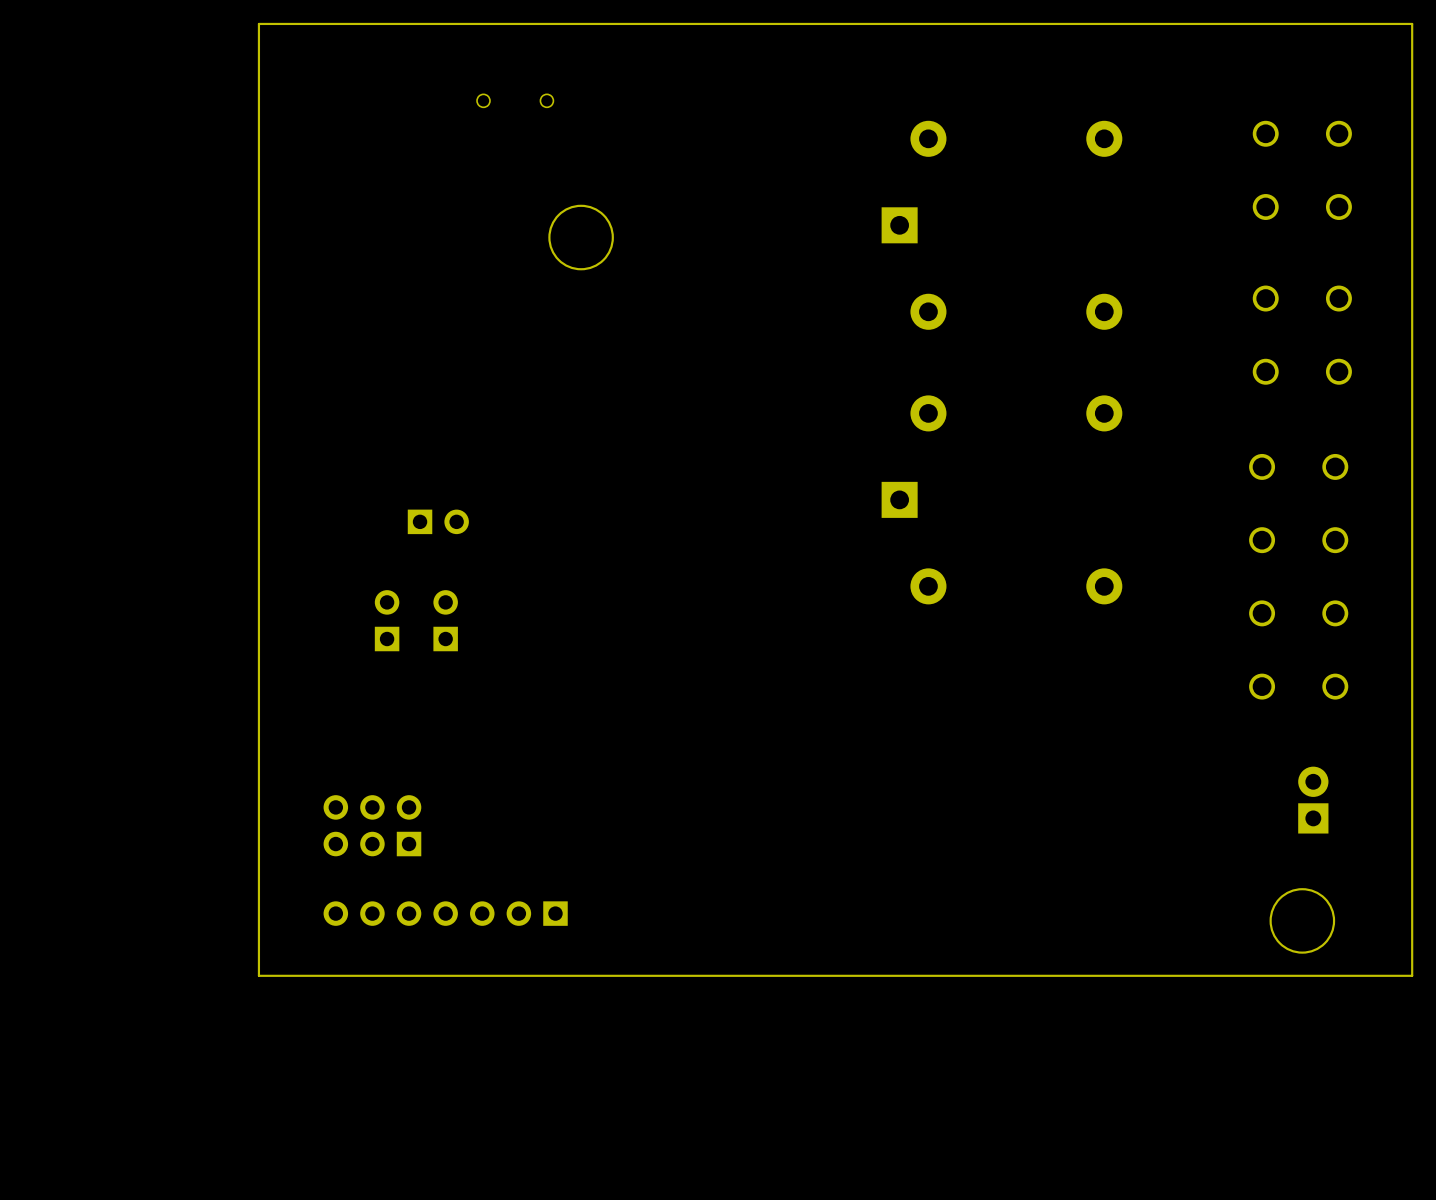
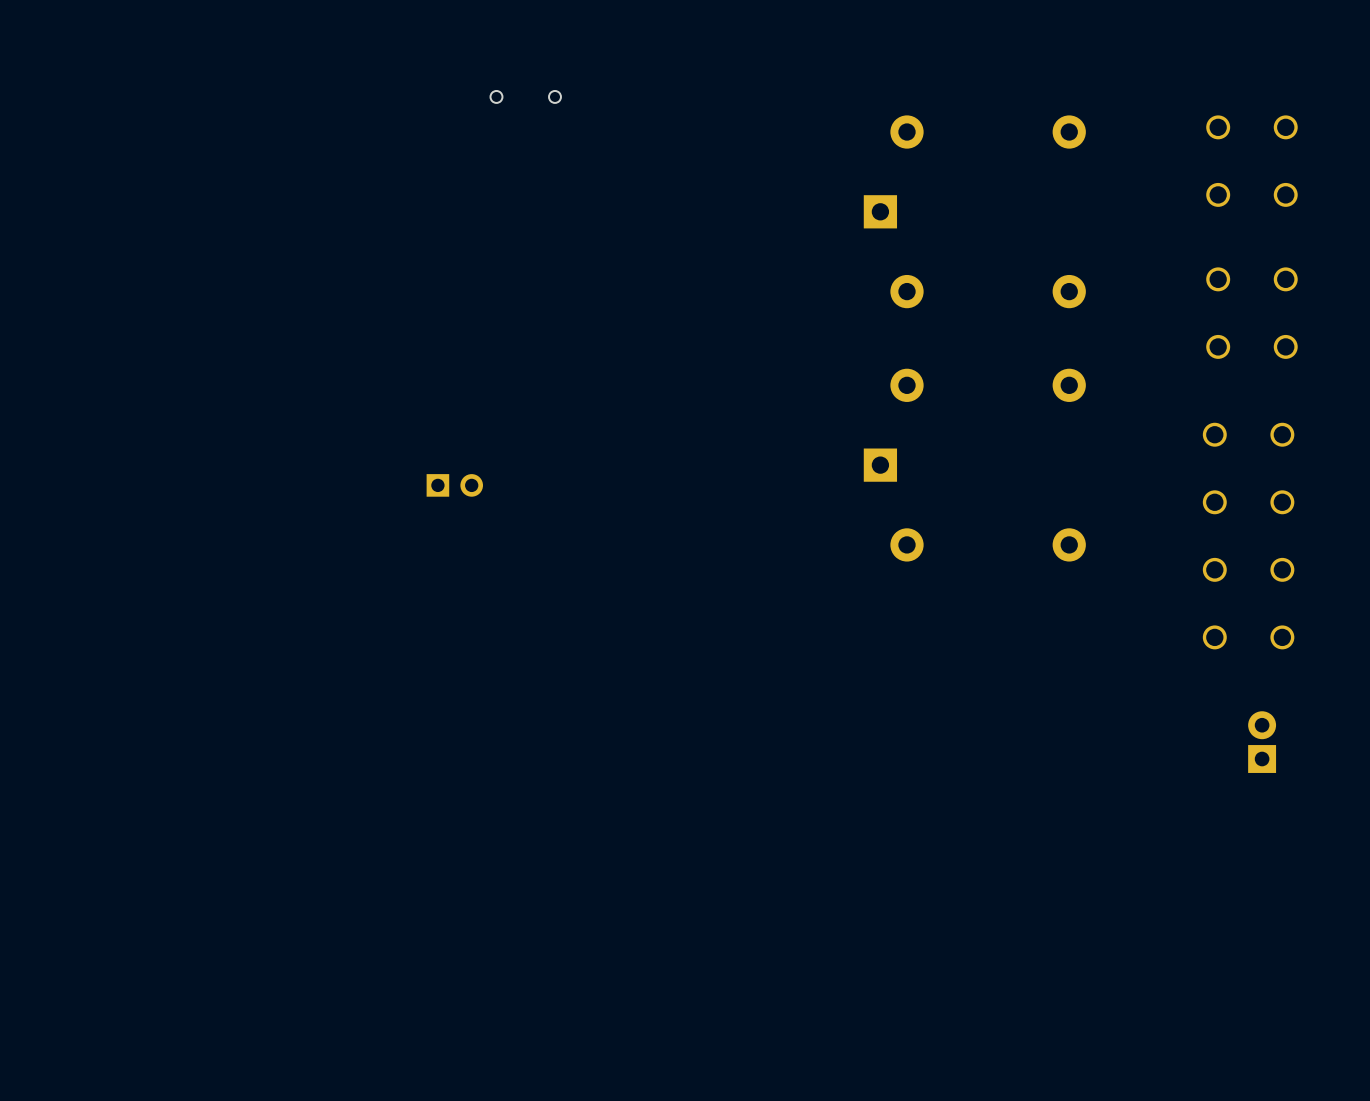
board edge: (1412, 23) (1412, 975) (258, 975) (258, 23) (1412, 23) -> none
round board edge: [548, 204, 614, 271] -> none
part: (387, 620) -> none
part: (445, 620) -> none
part: (372, 825) -> none
round board edge: [1269, 888, 1336, 954] -> none
part: (445, 913) -> none

